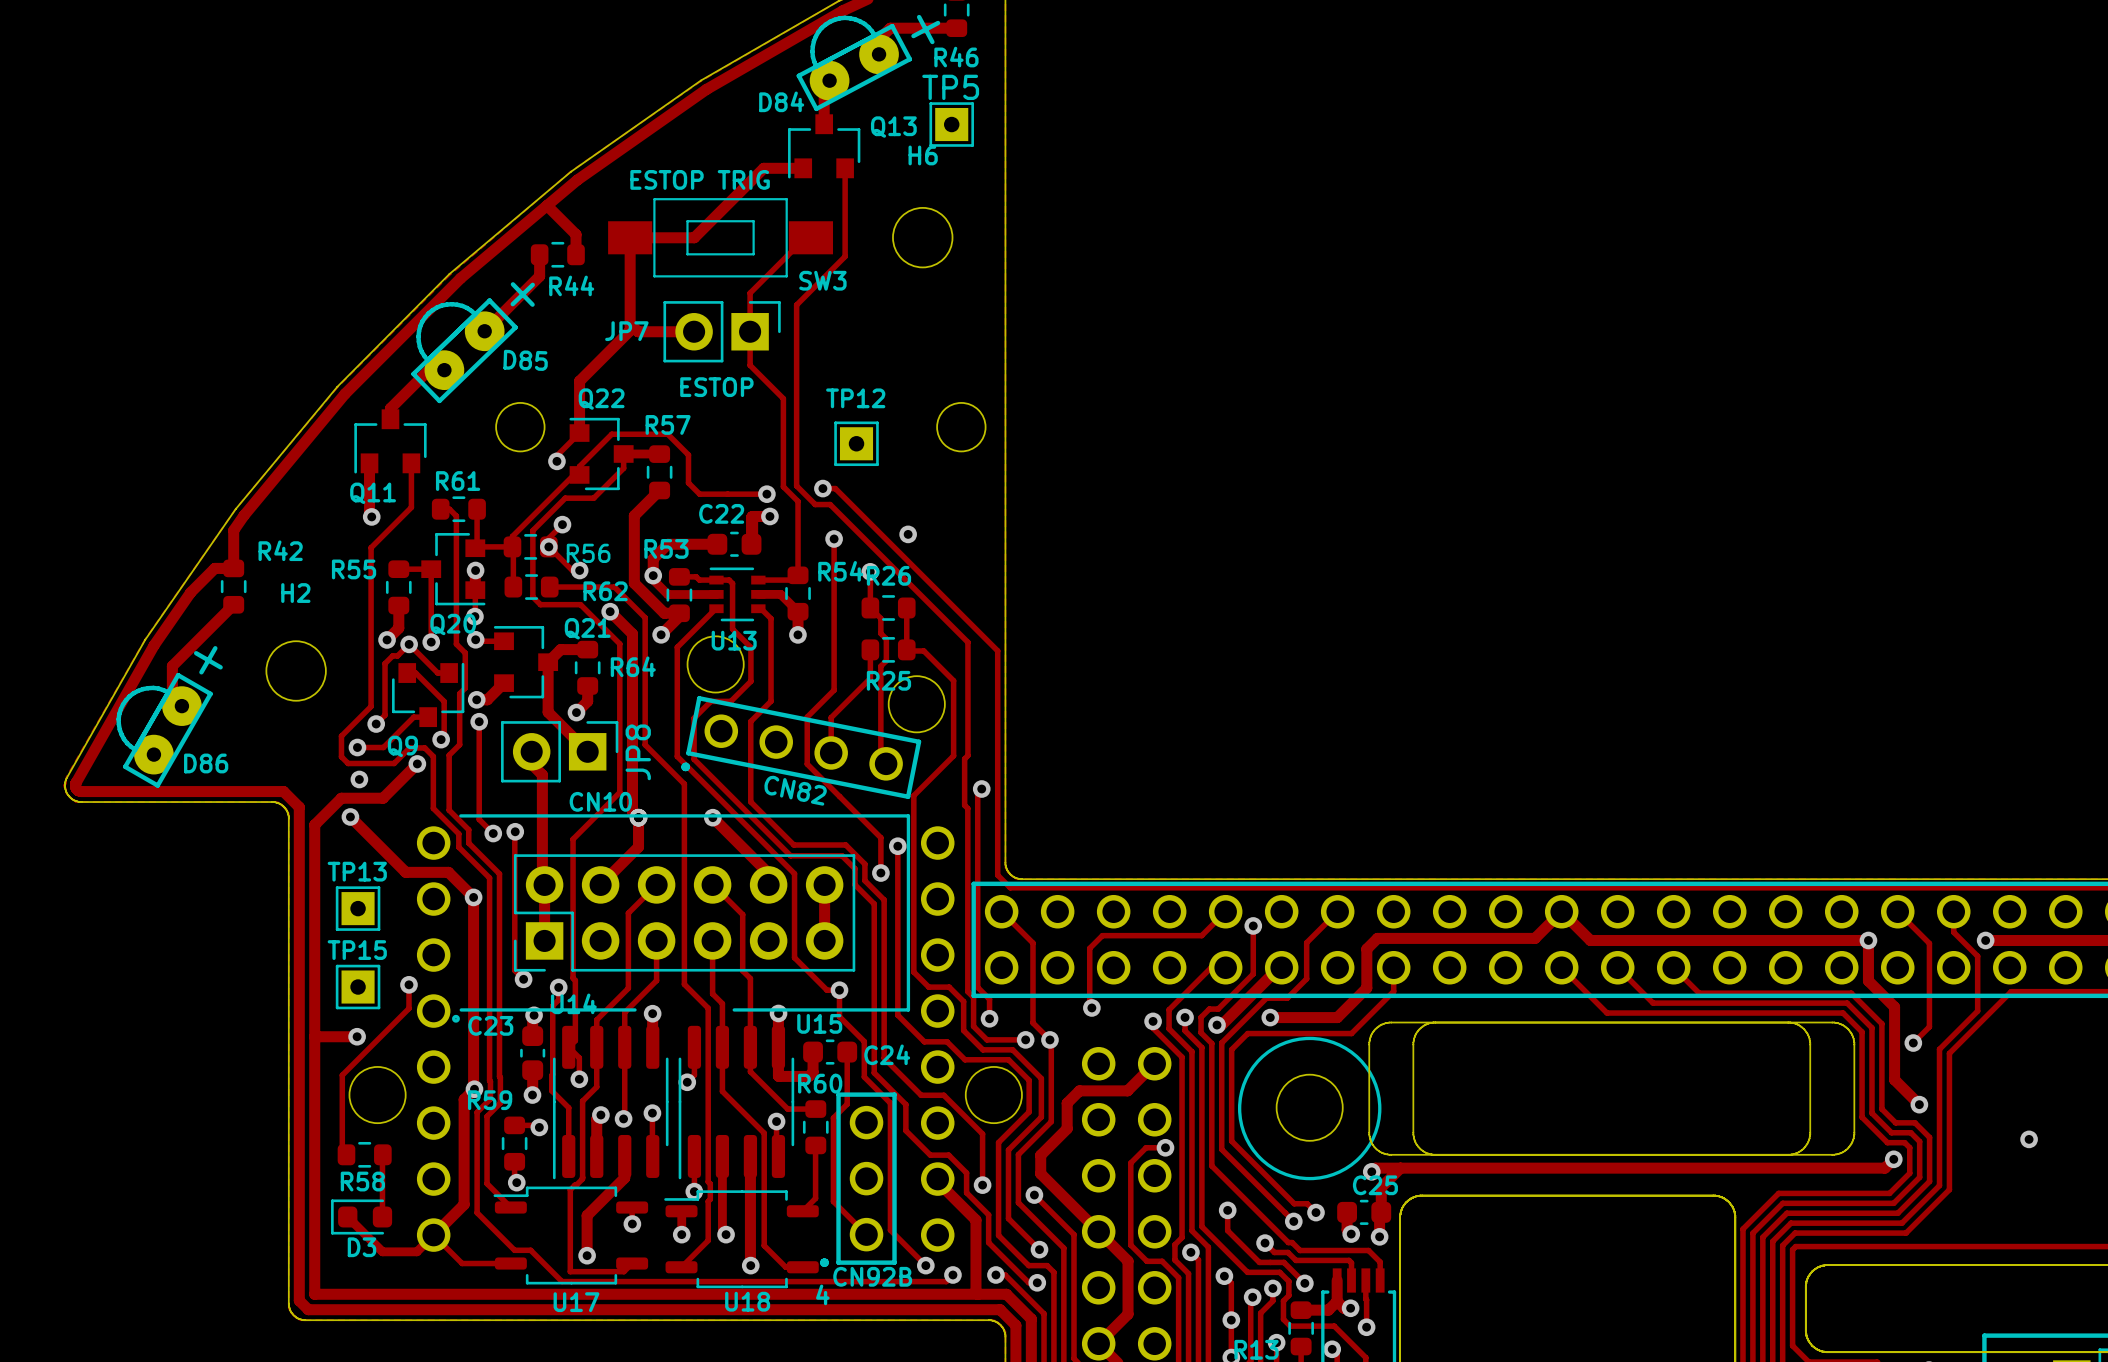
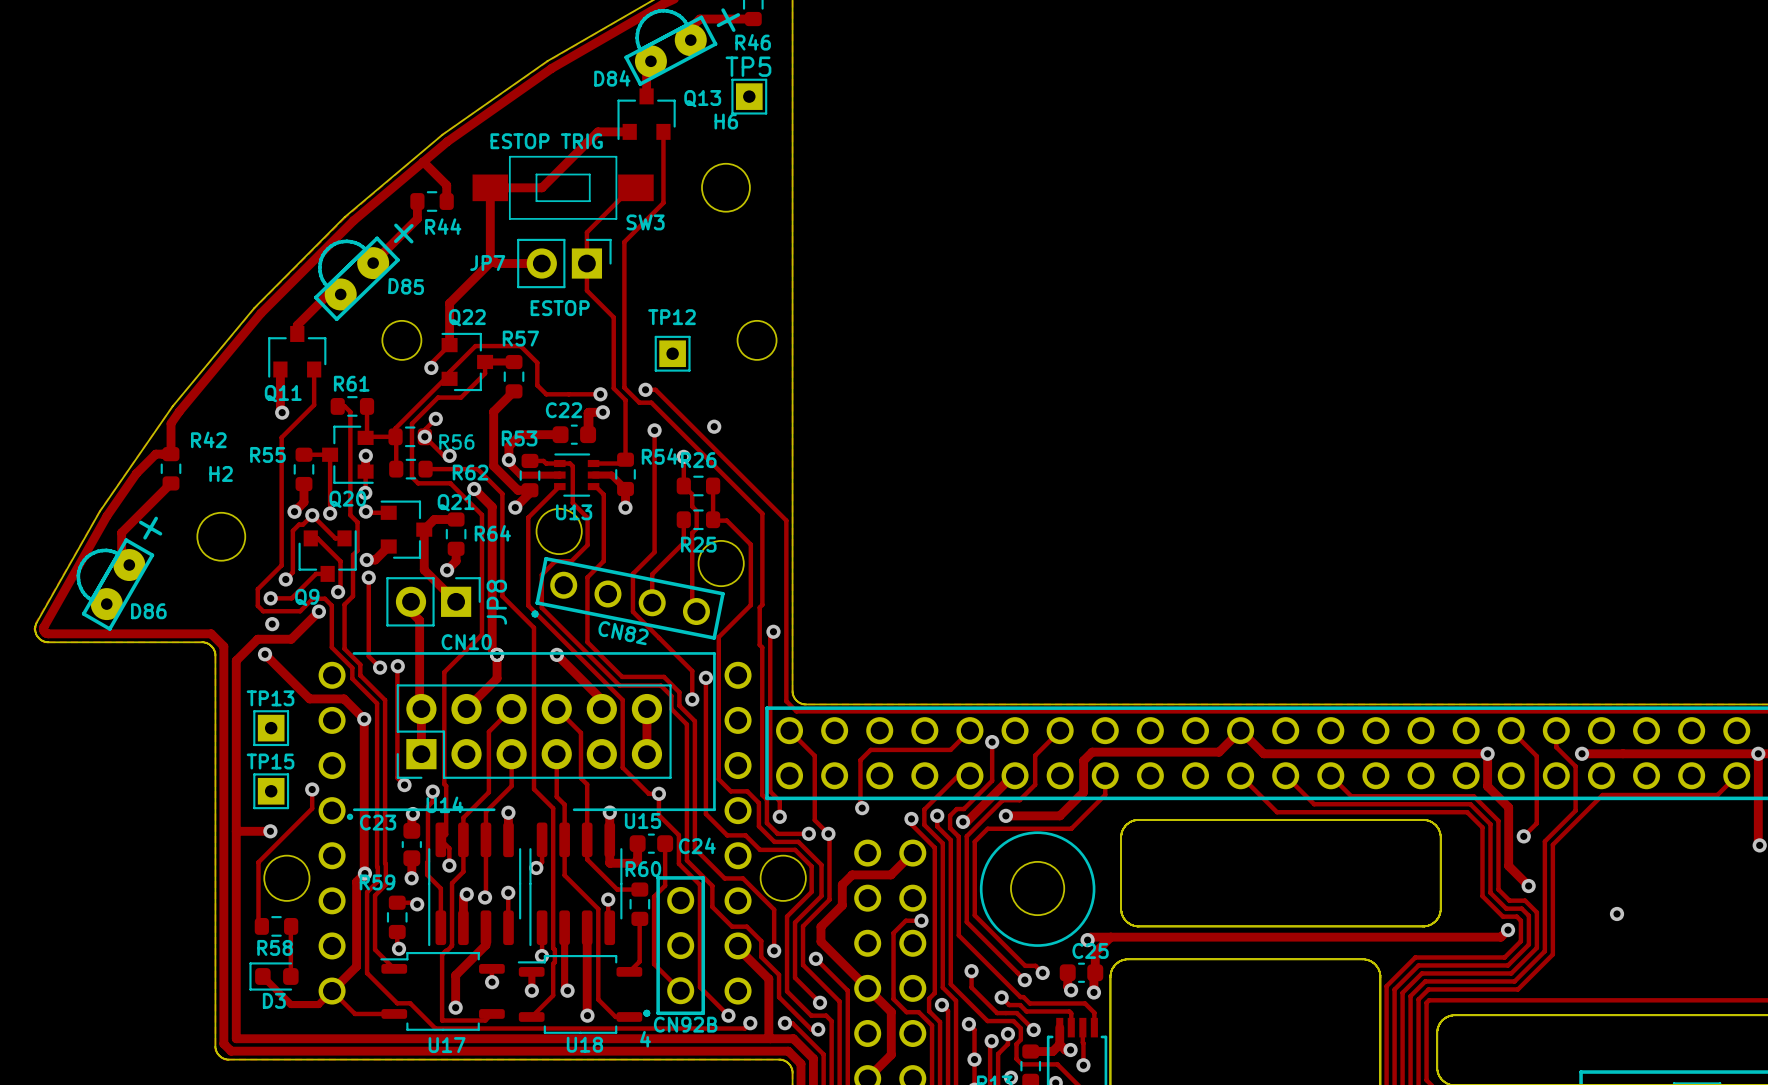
board edge: (1433, 1022) (1385, 1023) (1374, 1030) (1369, 1042) (1369, 1134) (1372, 1143) (1377, 1149) (1385, 1154) (1433, 1154) -> (1137, 819) (1126, 825) (1121, 836) (1121, 913) (1127, 922) (1137, 926)
board edge: (1790, 1022) (1838, 1023) (1849, 1030) (1854, 1042) (1854, 1134) (1851, 1143) (1846, 1149) (1838, 1154) (1790, 1154) -> (1424, 819) (1435, 825) (1440, 836) (1440, 913) (1434, 922) (1424, 926)

